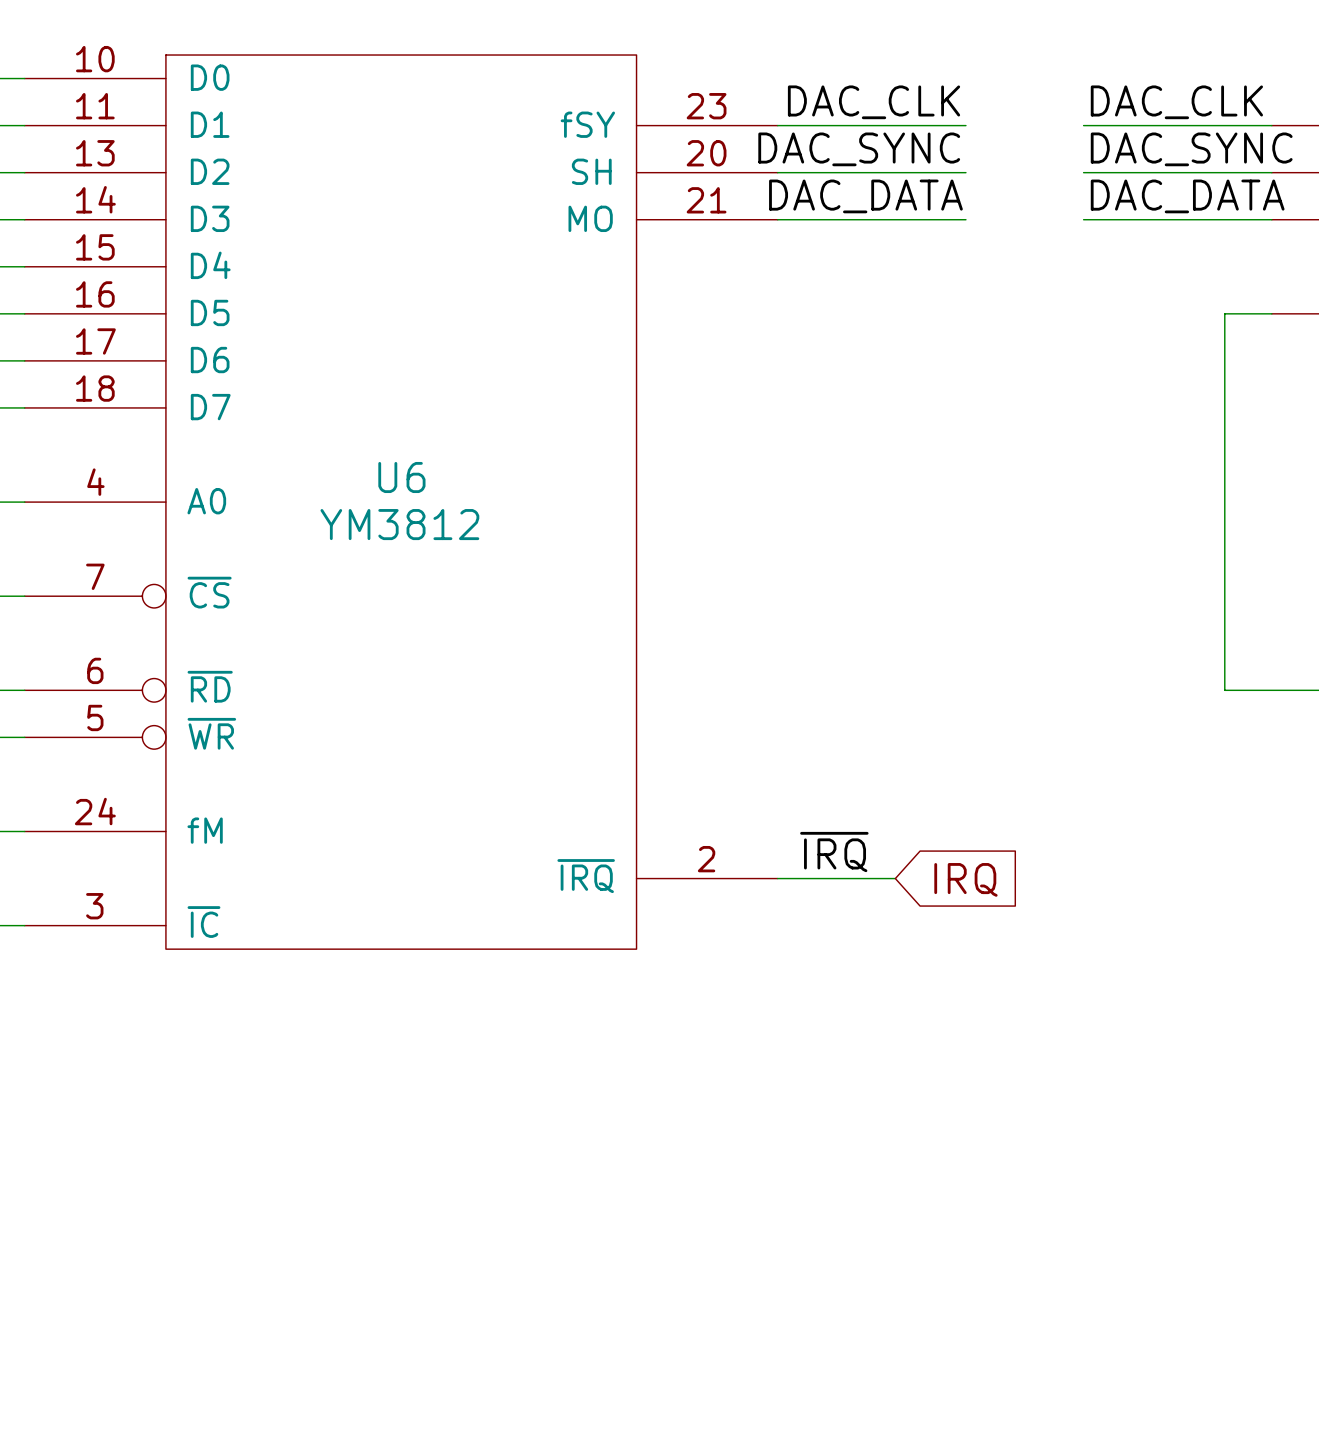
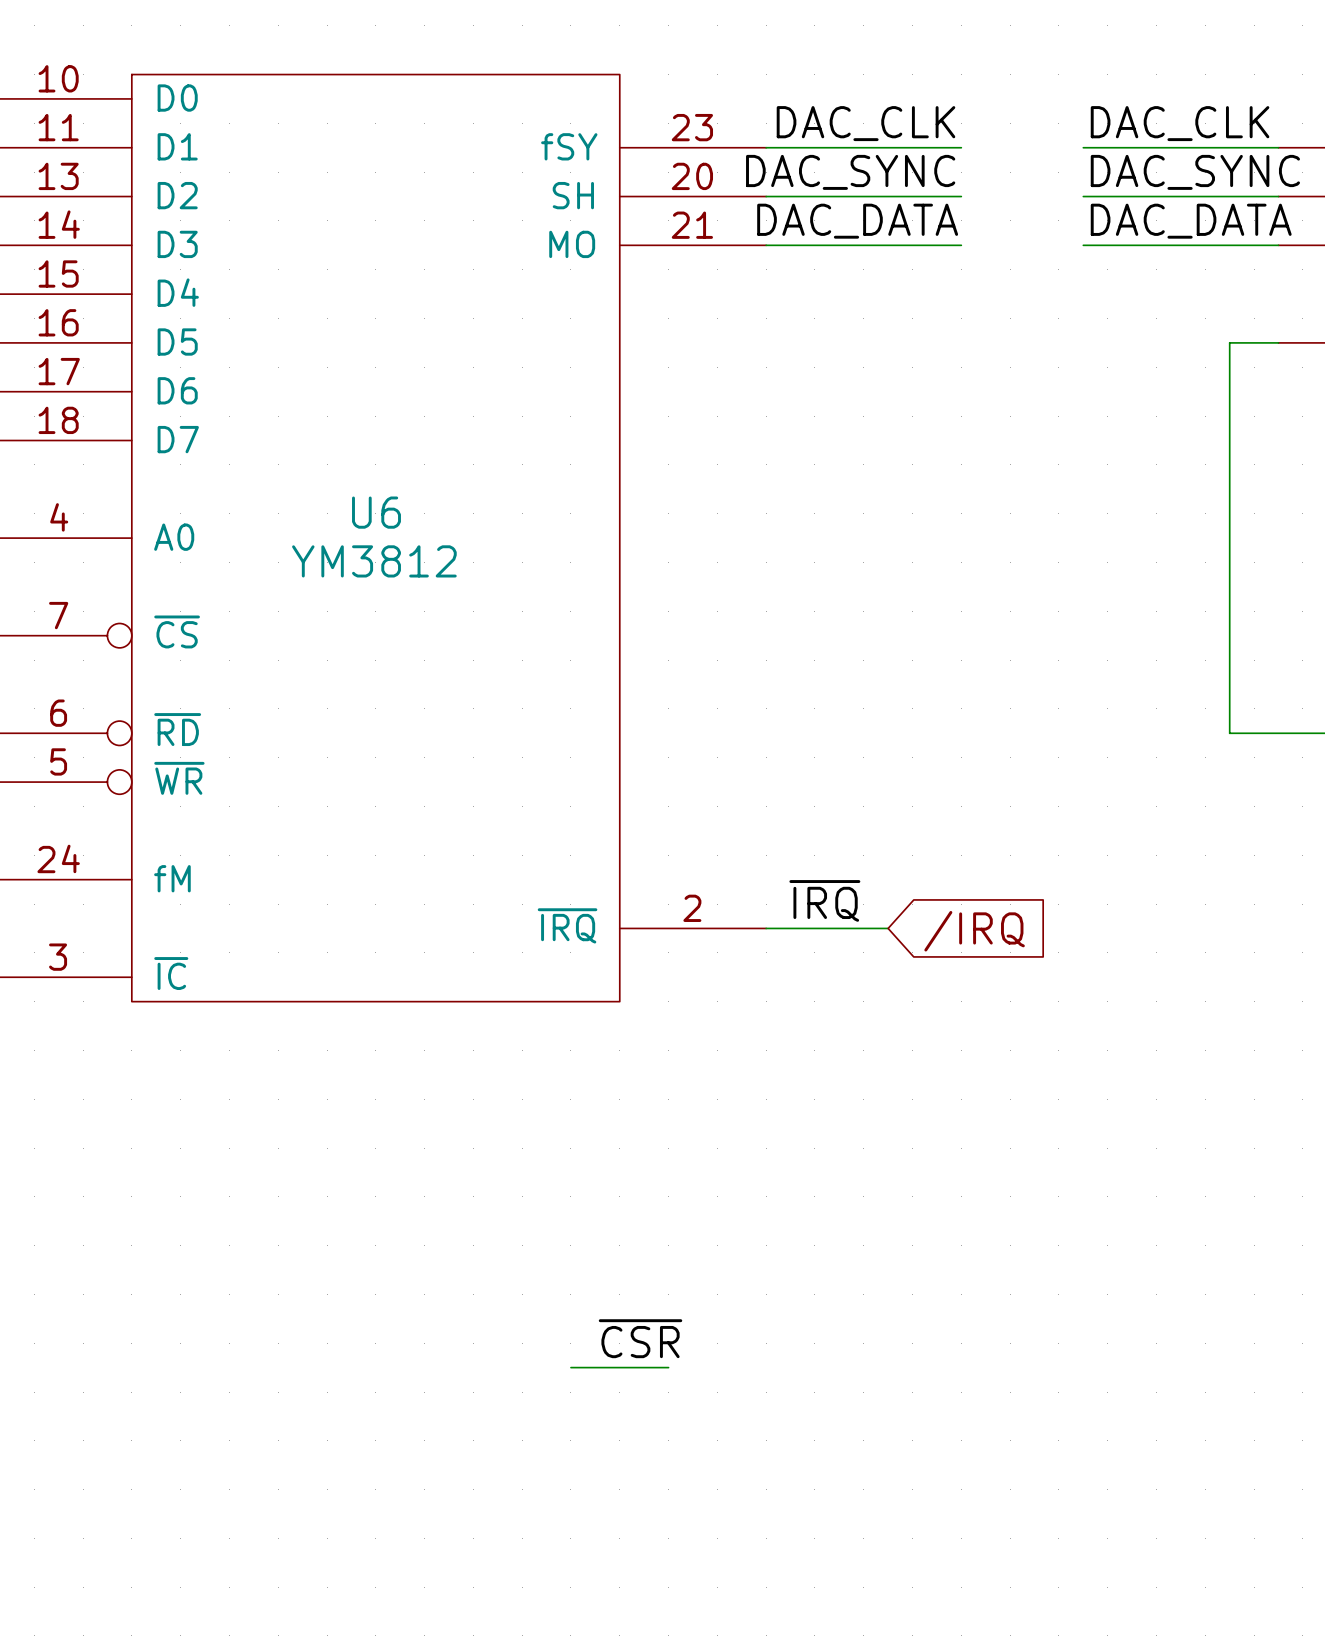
global label: IRQ (965, 879) -> /IRQ (974, 931)
label: none -> ~{CSR} (640, 1338)
wire: none -> (570, 1367) (668, 1367)

